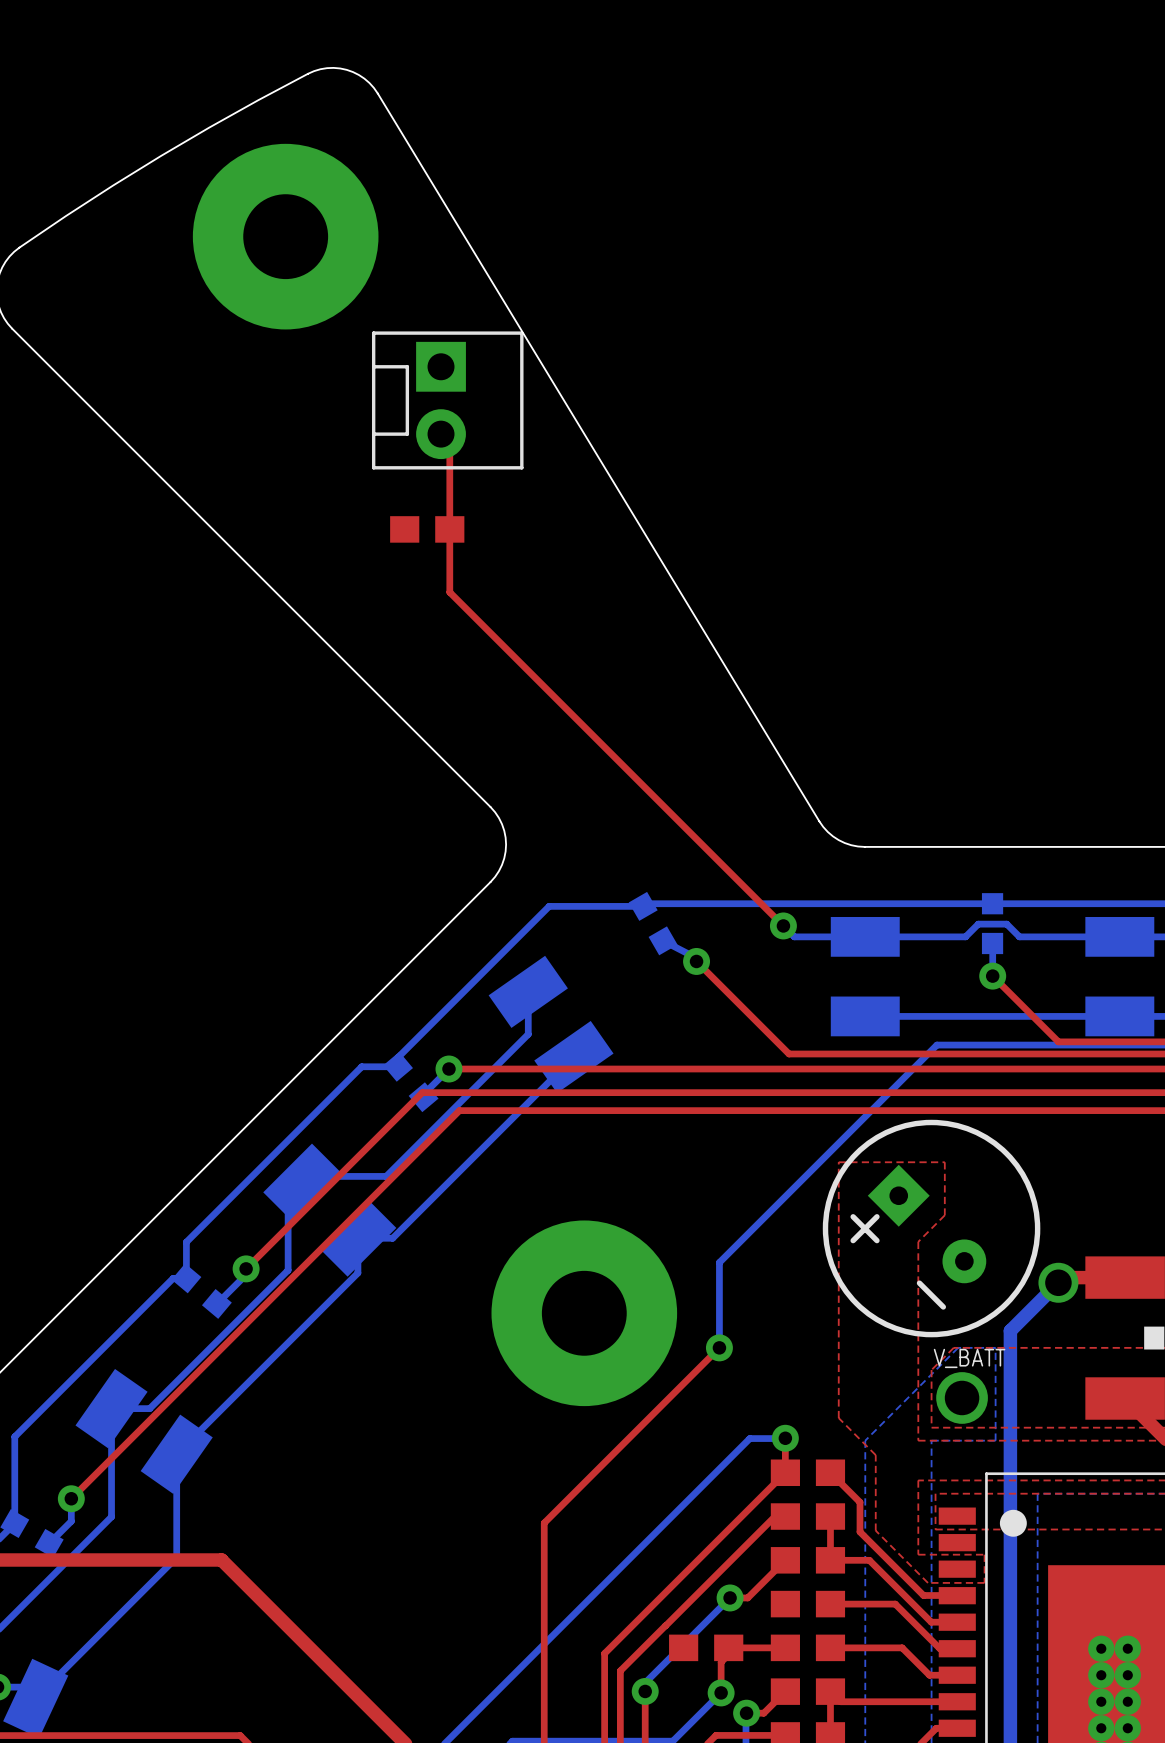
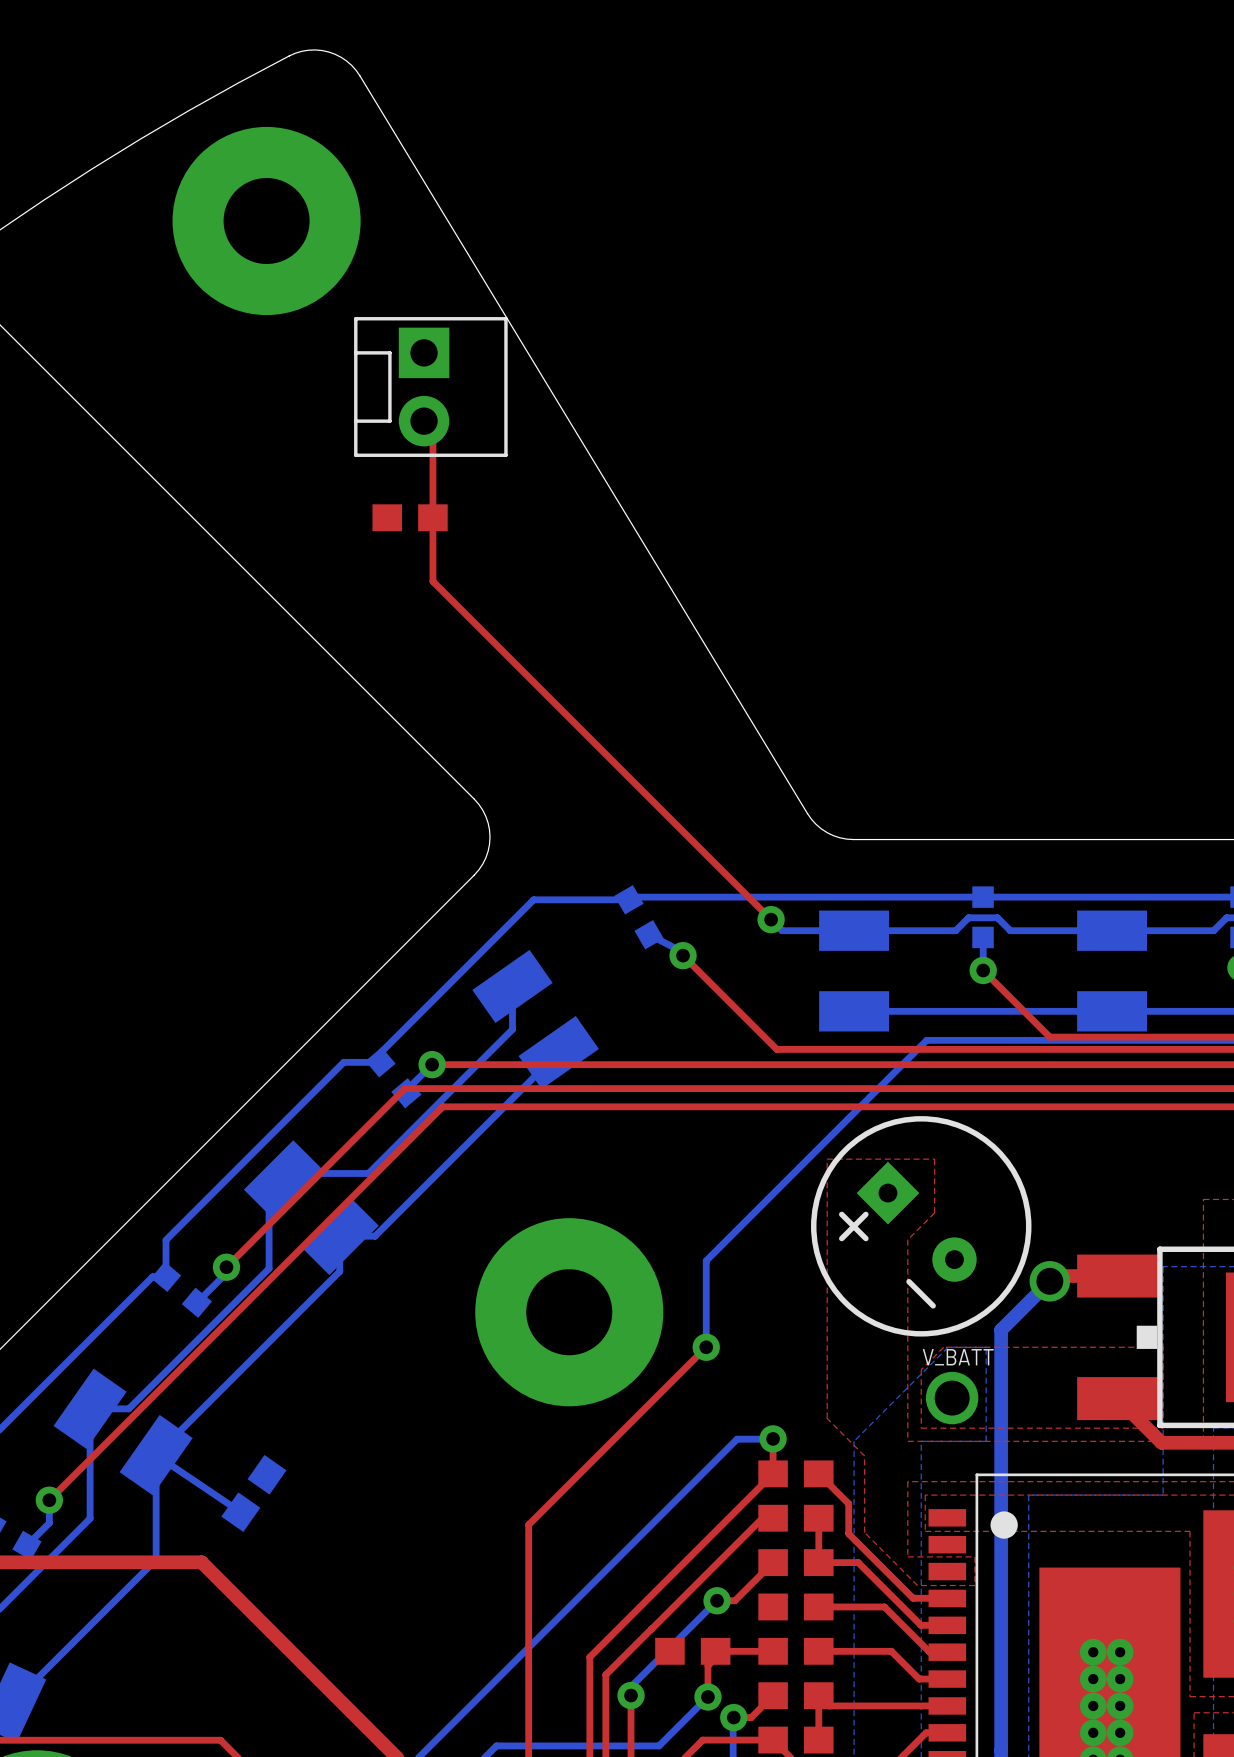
bottom track: none -> (156, 1455) (240, 1512)
part: none -> (253, 1493)

